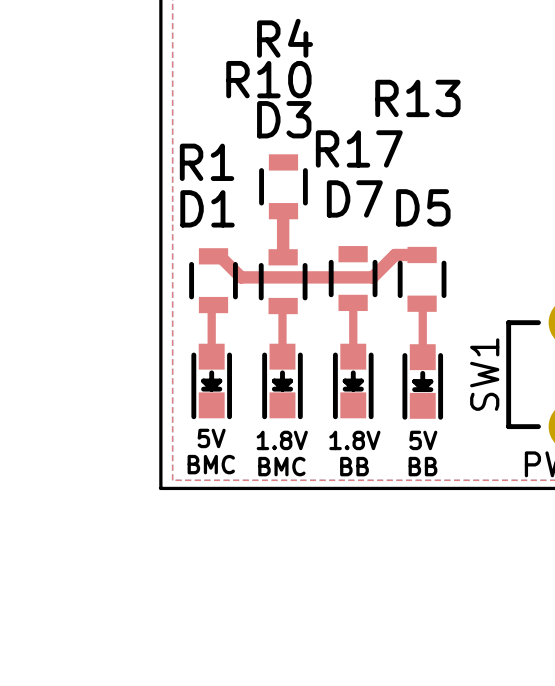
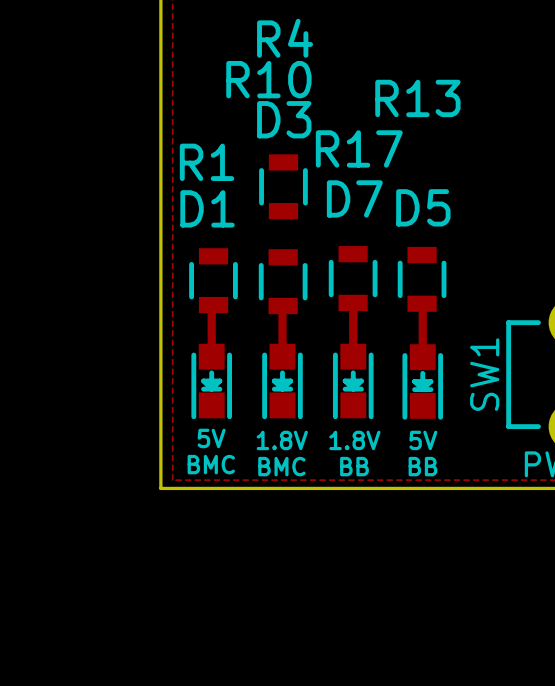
top track: (283, 211) (283, 257) -> none
top track: (422, 255) (395, 255) (372, 277) (241, 277) (220, 256) (213, 256) -> none

